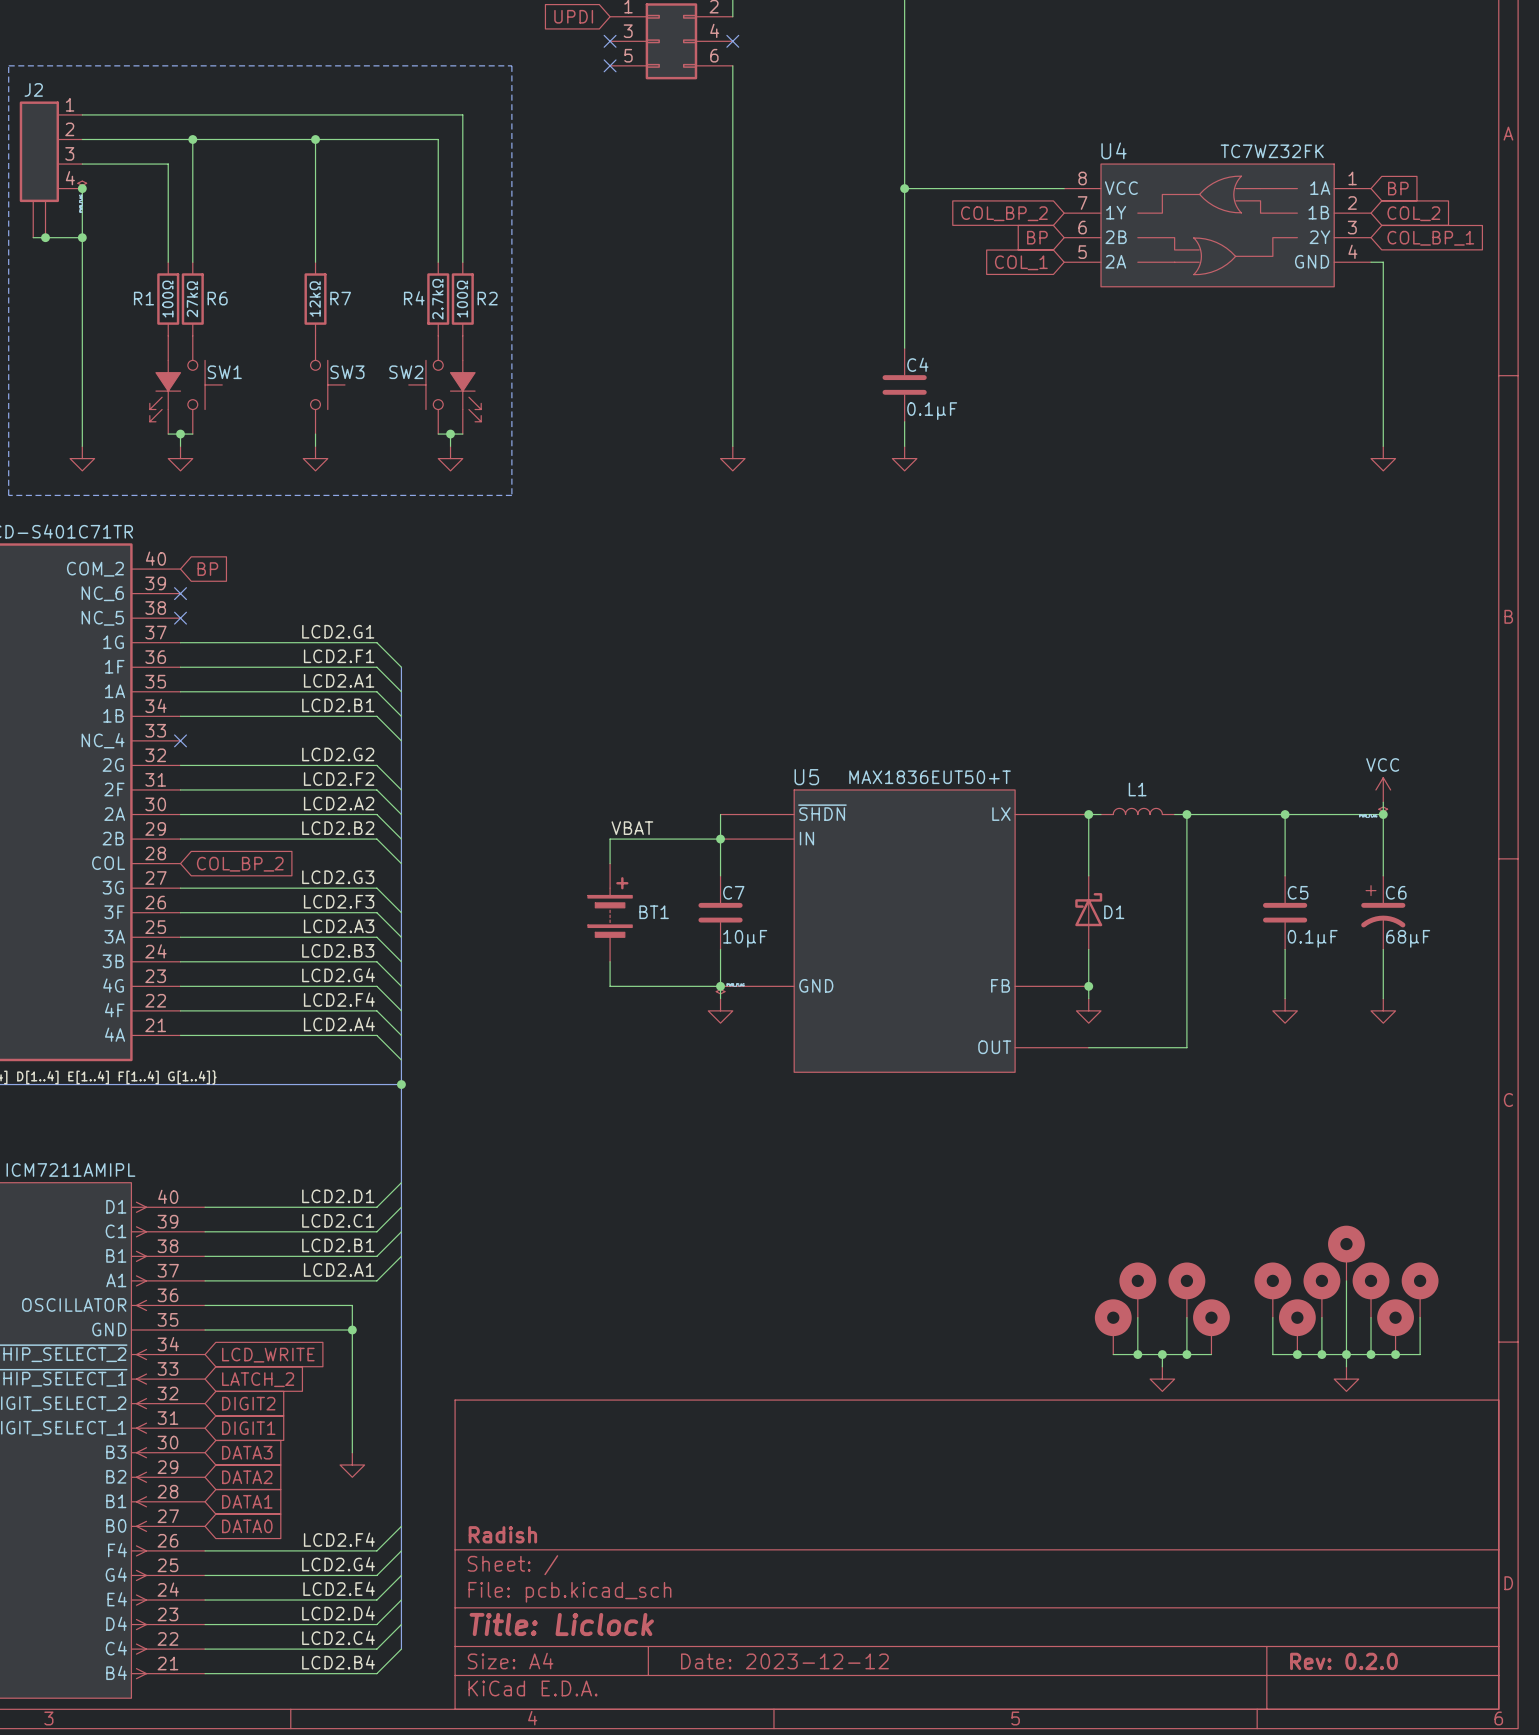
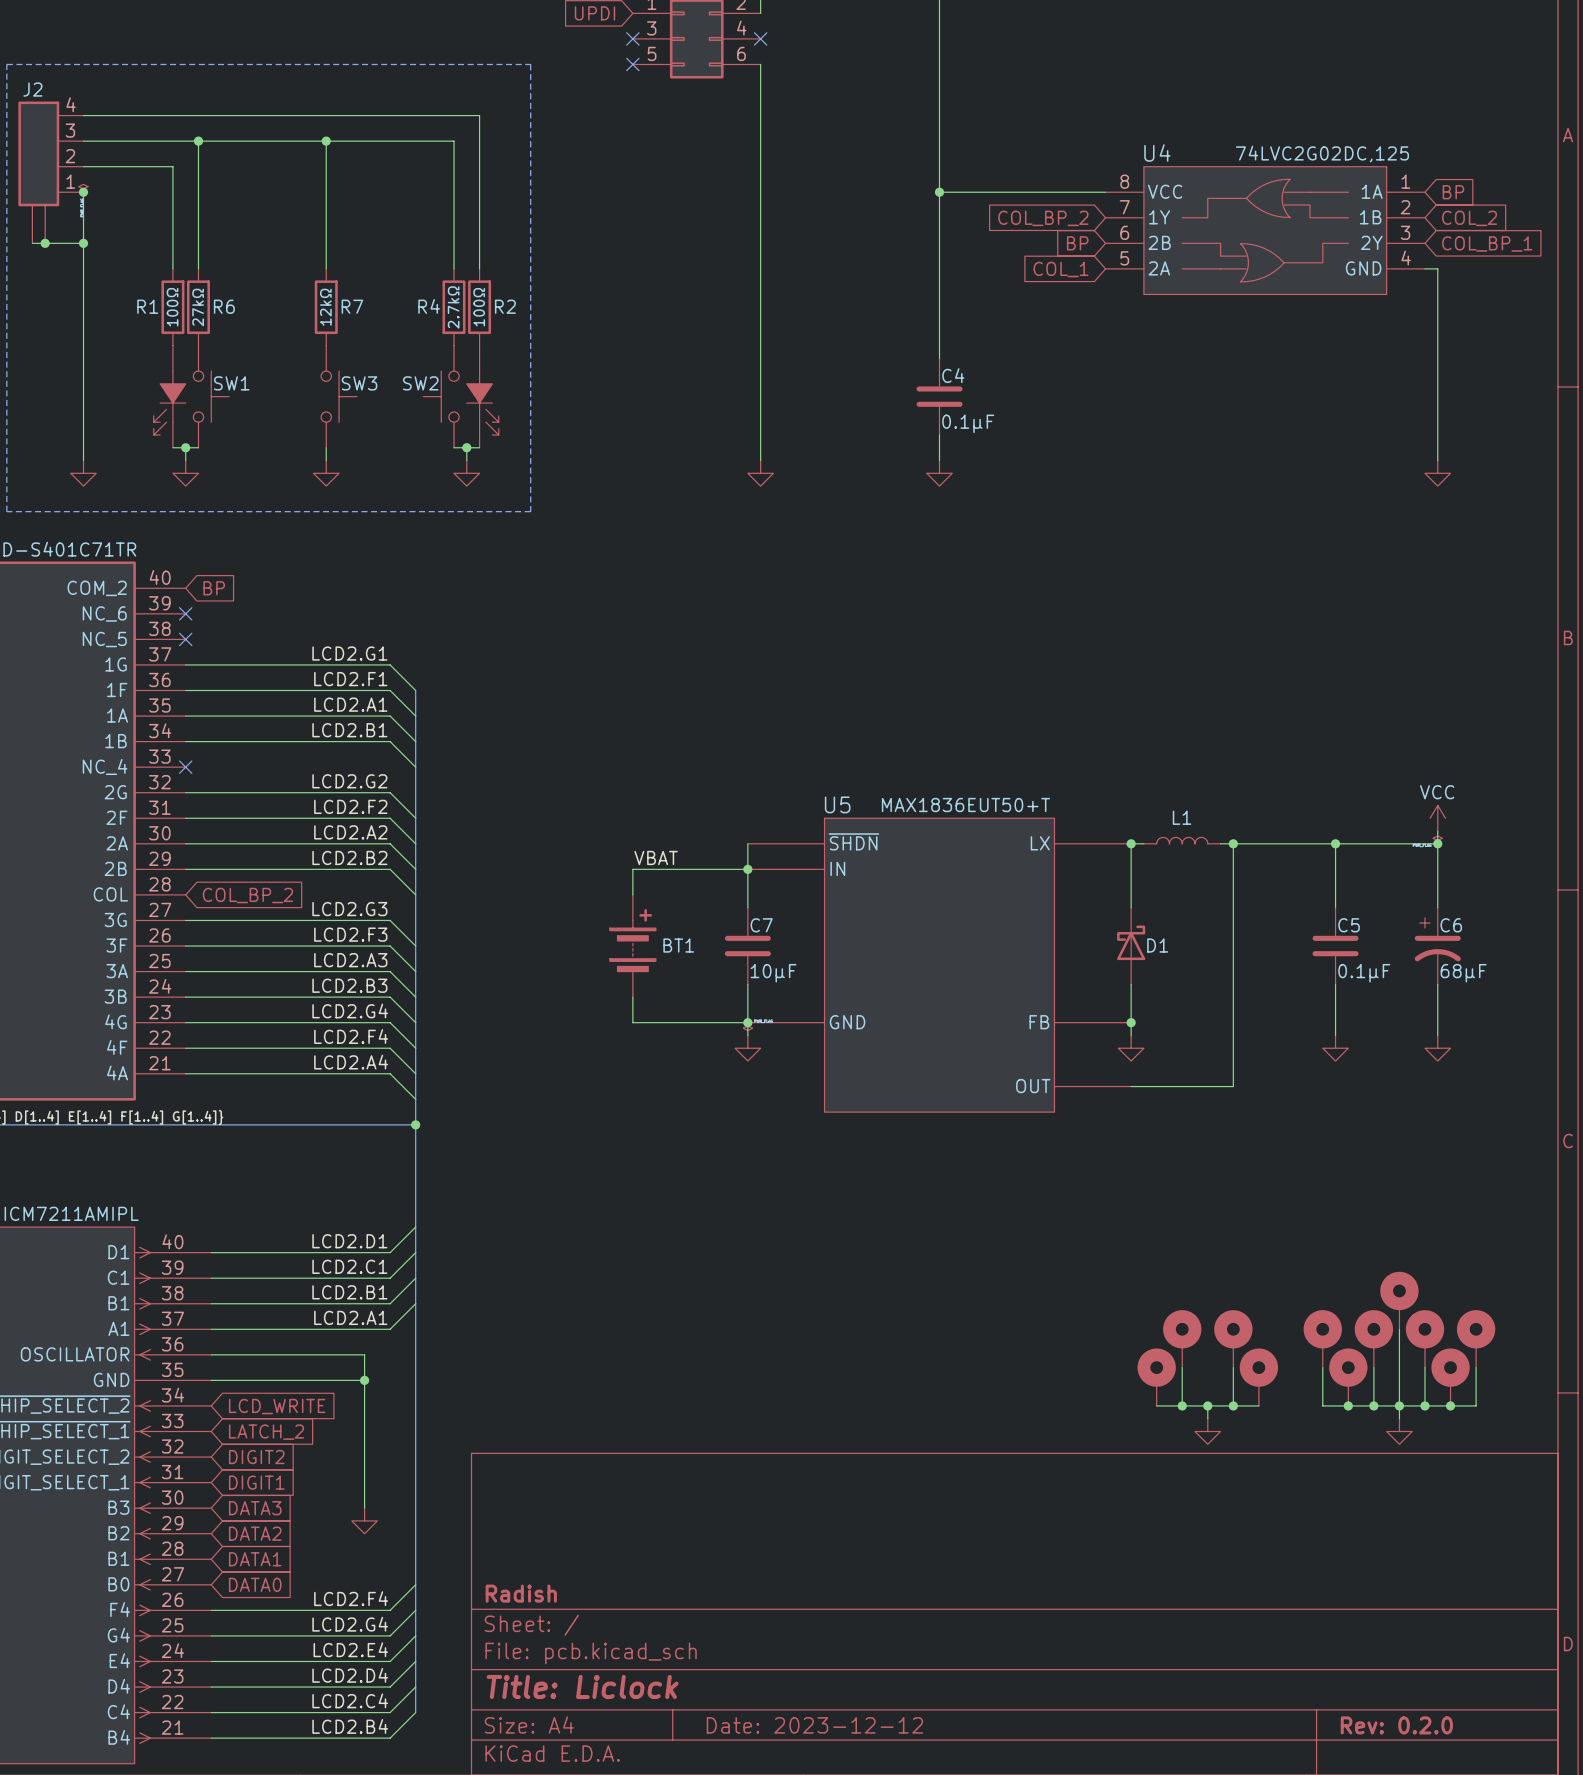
J2 pin number: 1 (70, 104) -> 4 (71, 104)
J2 pin number: 2 (69, 129) -> 3 (70, 130)
U4 text: TC7WZ32FK (1272, 151) -> 74LVC2G02DC,125 (1322, 154)
J2 pin number: 3 (69, 153) -> 2 (70, 156)
J2 pin number: 4 (70, 178) -> 1 (70, 181)

